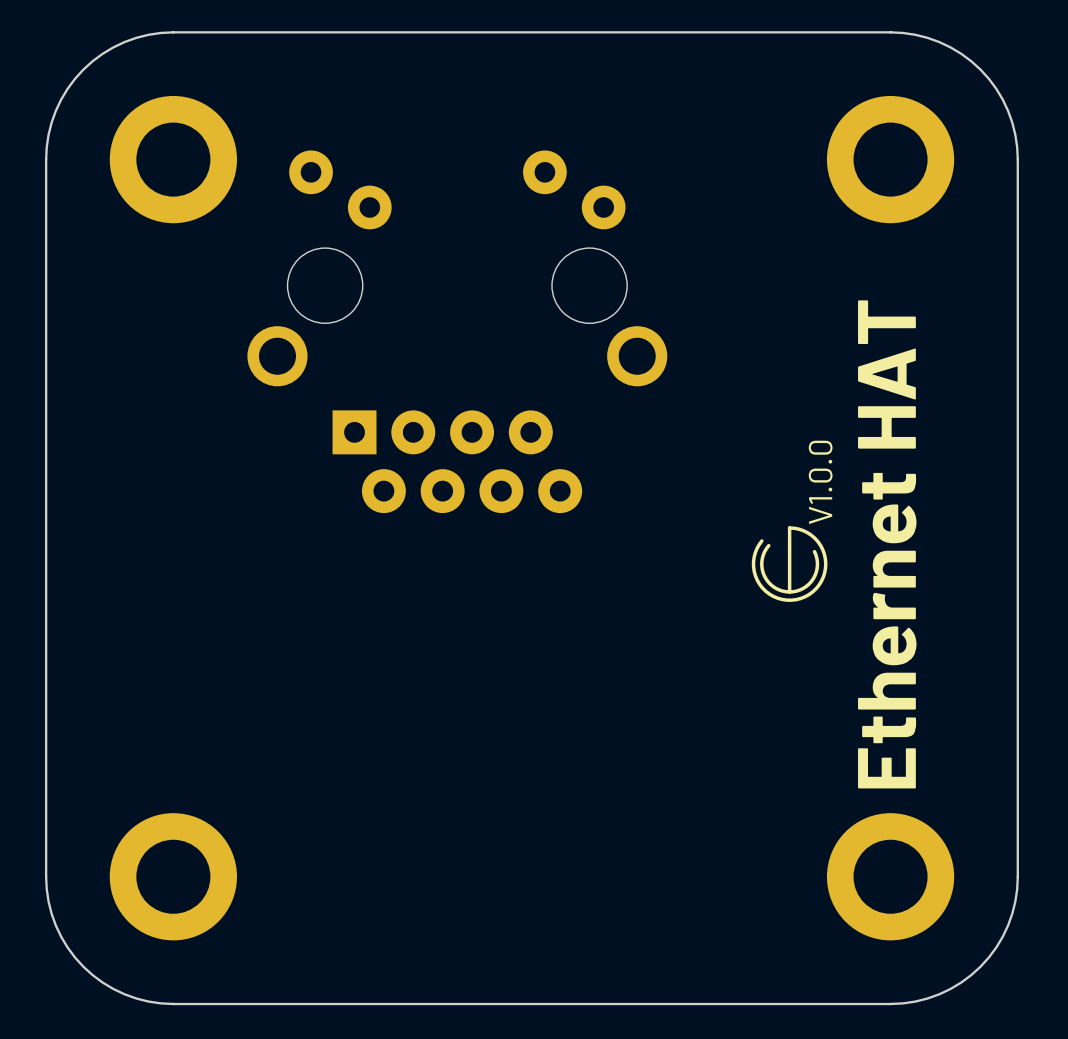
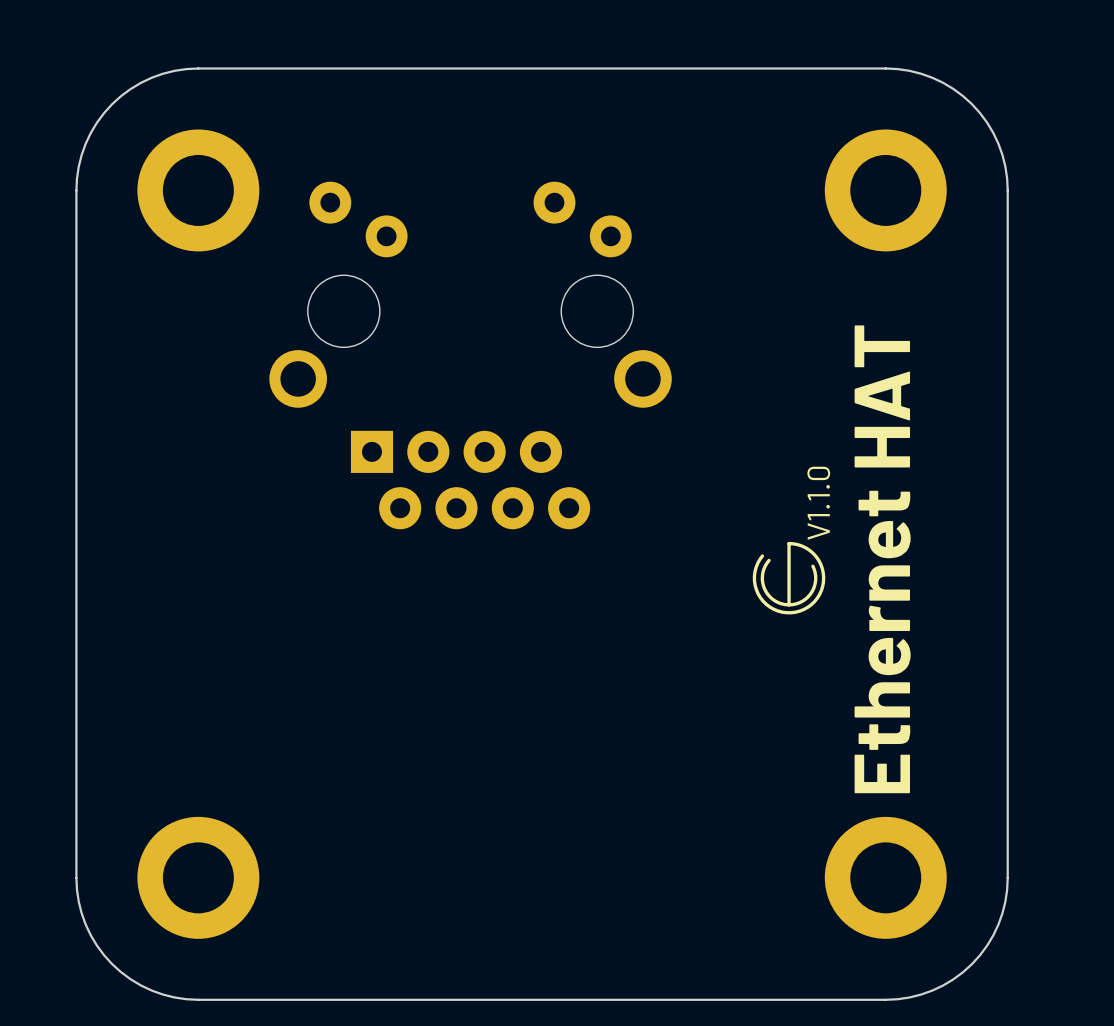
text: V1.0.0 (820, 482) -> V1.1.0 (818, 503)

